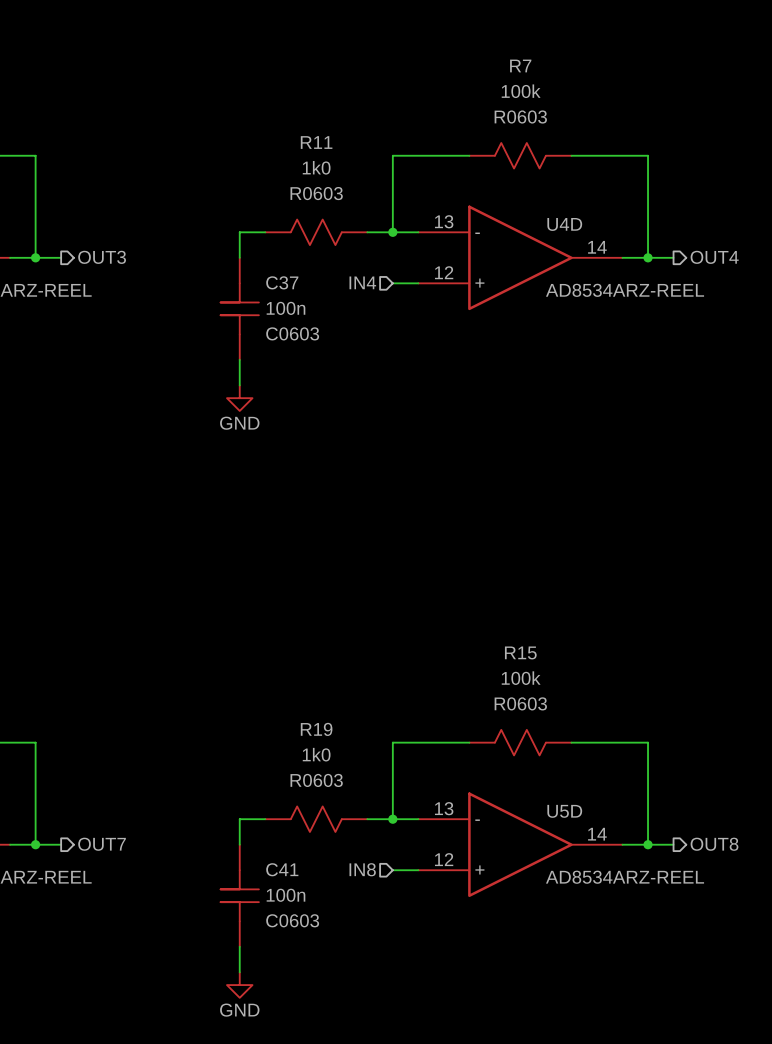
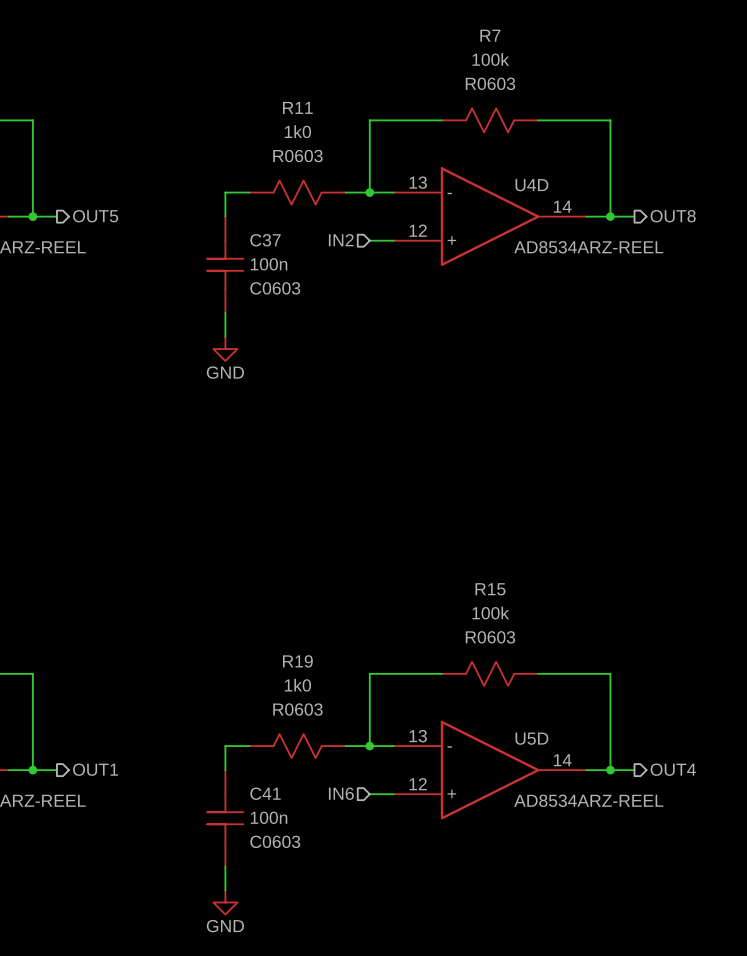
hierarchical label: OUT3 (102, 257) -> OUT5 (95, 216)
hierarchical label: OUT4 (714, 257) -> OUT8 (673, 216)
hierarchical label: IN4 (362, 282) -> IN2 (341, 240)
hierarchical label: OUT7 (102, 844) -> OUT1 (95, 769)
hierarchical label: OUT8 (714, 844) -> OUT4 (673, 769)
hierarchical label: IN8 (362, 869) -> IN6 (341, 793)

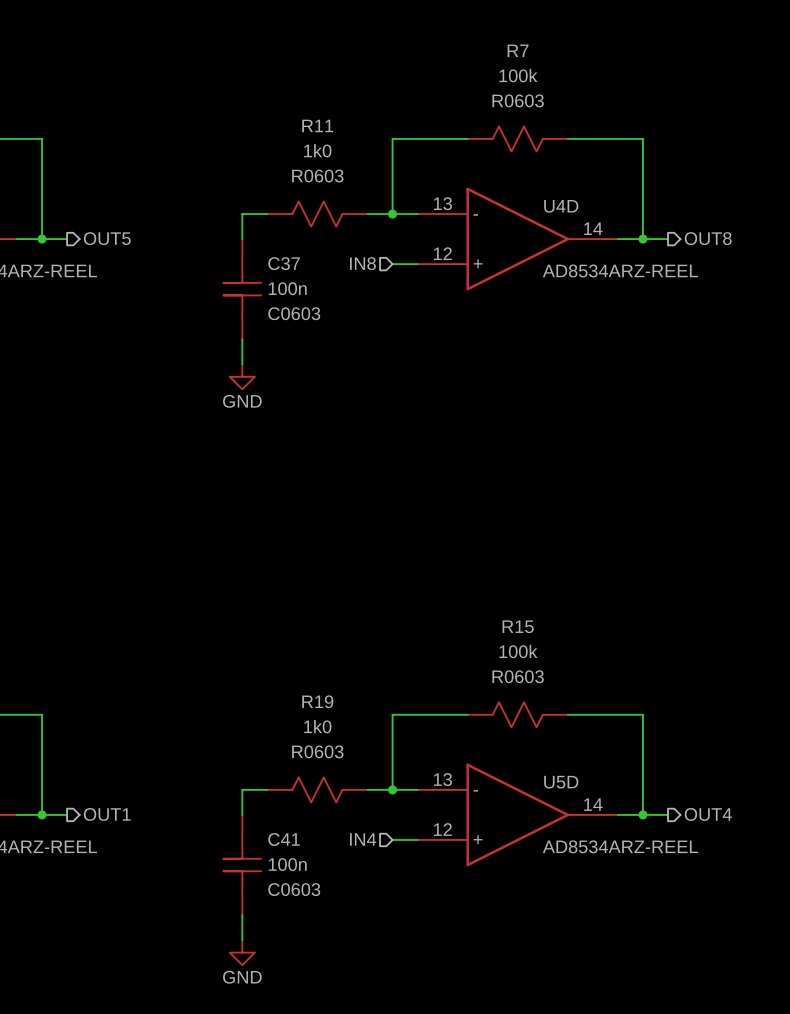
hierarchical label: IN2 (341, 240) -> IN8 (362, 263)
hierarchical label: IN6 (341, 793) -> IN4 (363, 839)

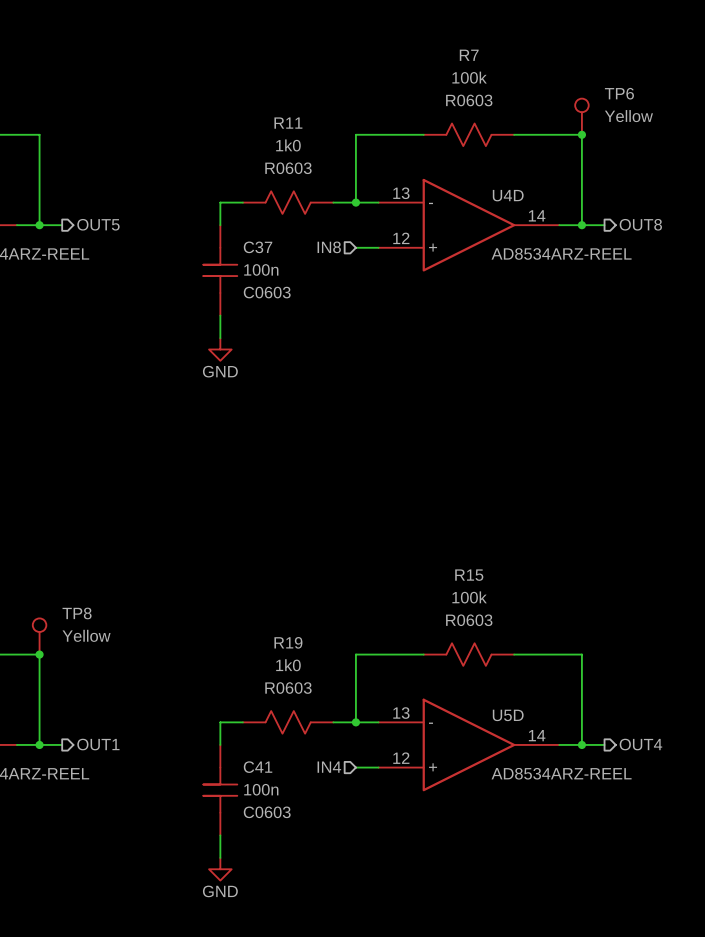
TP6: none -> (581, 116)
junction: none -> (581, 134)
TP8: none -> (39, 636)
junction: none -> (39, 654)

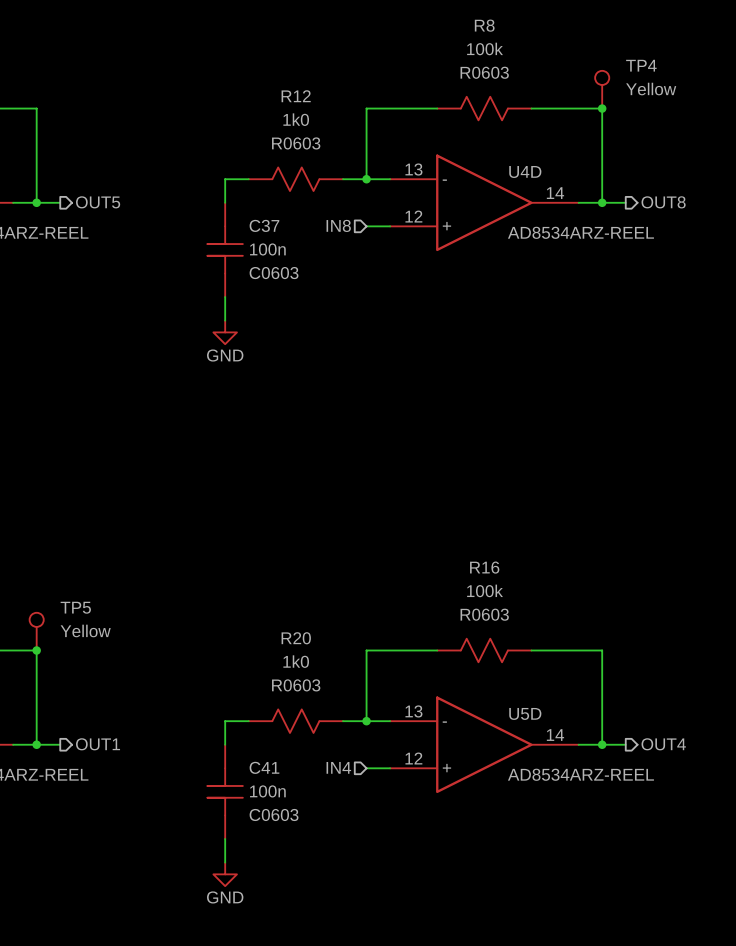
R7 name: R7 (469, 55) -> R8 (484, 25)
TP6 name: TP6 (619, 93) -> TP4 (641, 65)
R11 name: R11 (288, 123) -> R12 (296, 96)
R15 name: R15 (469, 575) -> R16 (484, 567)
TP8 name: TP8 (77, 613) -> TP5 (75, 607)
R19 name: R19 (288, 642) -> R20 (296, 638)

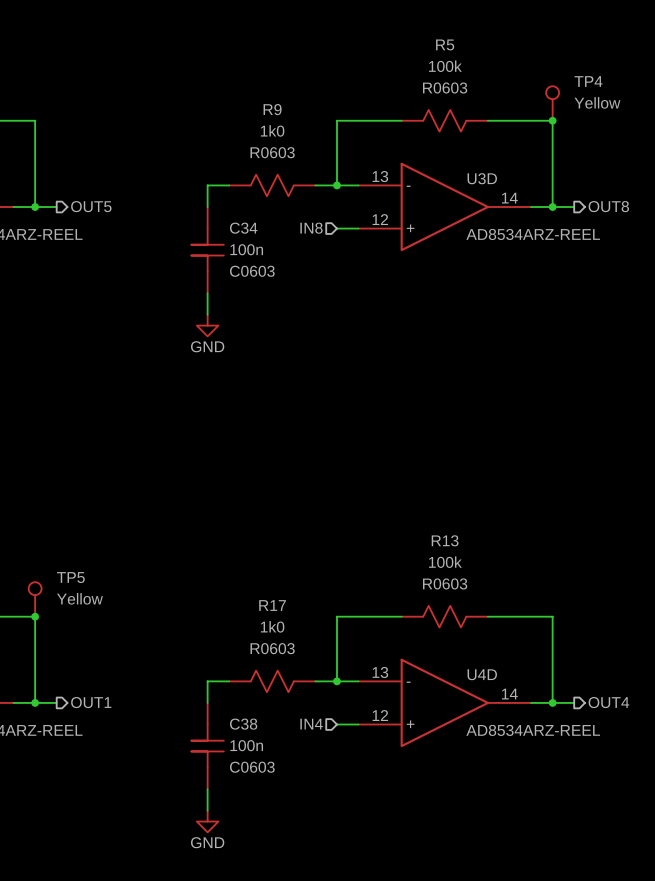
R8 name: R8 (484, 25) -> R5 (445, 44)
R12 name: R12 (296, 96) -> R9 (272, 109)
U4D name: U4D (525, 171) -> U3D (482, 178)
C37 name: C37 (264, 225) -> C34 (243, 228)
R16 name: R16 (484, 567) -> R13 (445, 540)
R20 name: R20 (296, 638) -> R17 (272, 605)
U5D name: U5D (525, 713) -> U4D (482, 674)
C41 name: C41 (264, 767) -> C38 (243, 724)

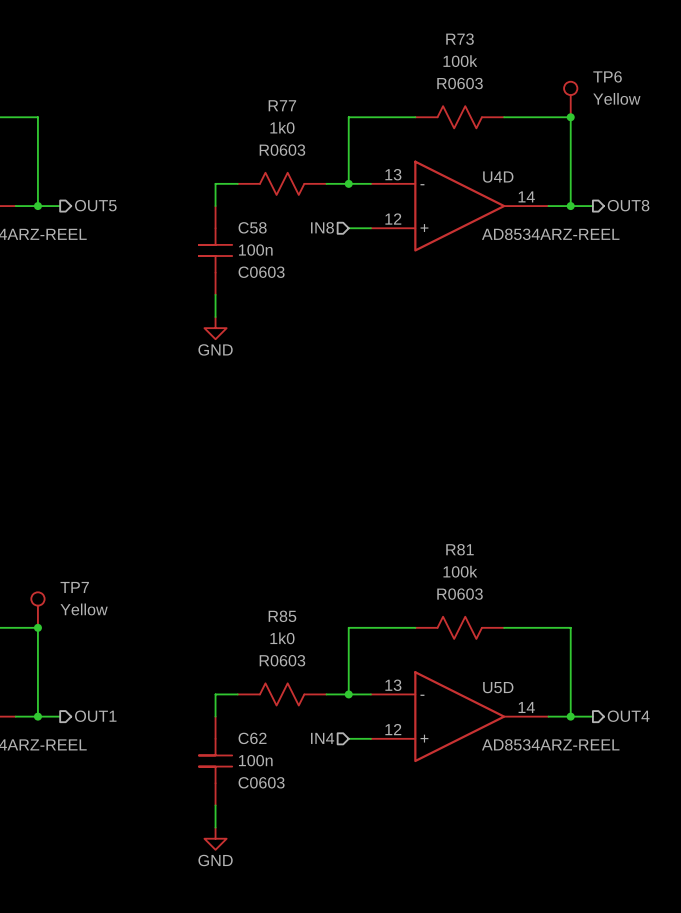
R5 name: R5 (445, 44) -> R73 (460, 39)
TP4 name: TP4 (588, 81) -> TP6 (607, 76)
R9 name: R9 (272, 109) -> R77 (282, 105)
U3D name: U3D (482, 178) -> U4D (498, 177)
C34 name: C34 (243, 228) -> C58 (252, 227)
R13 name: R13 (445, 540) -> R81 (460, 549)
TP5 name: TP5 (70, 577) -> TP7 (74, 587)
R17 name: R17 (272, 605) -> R85 (282, 616)
U4D name: U4D (482, 674) -> U5D (498, 687)
C38 name: C38 (243, 724) -> C62 (252, 738)

